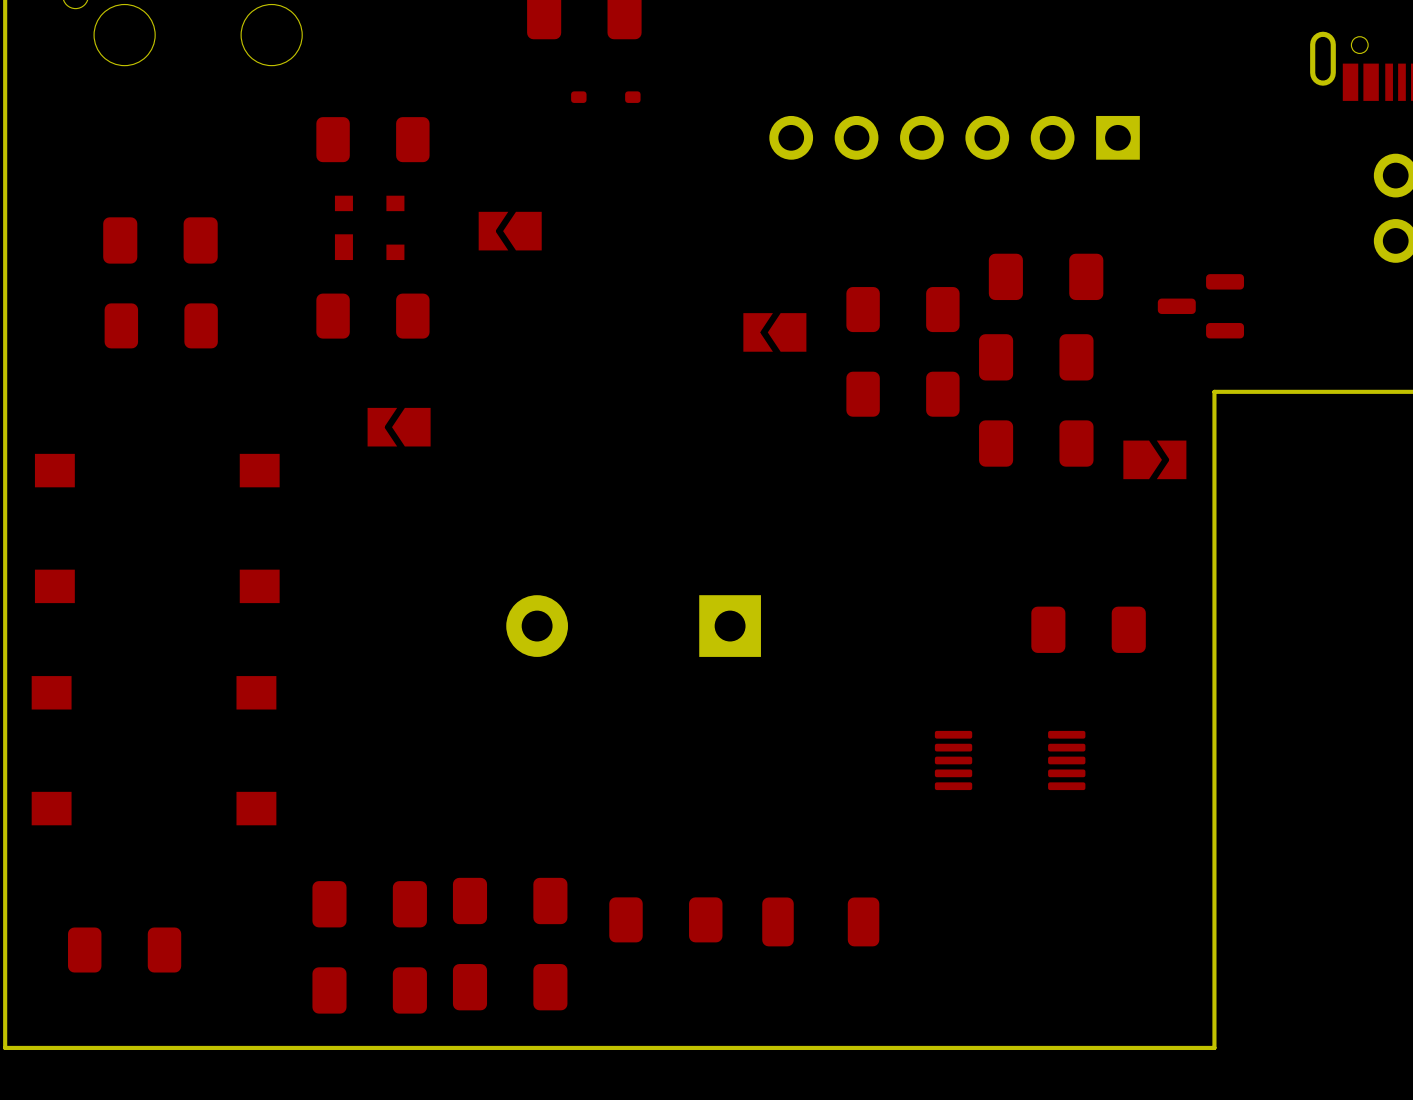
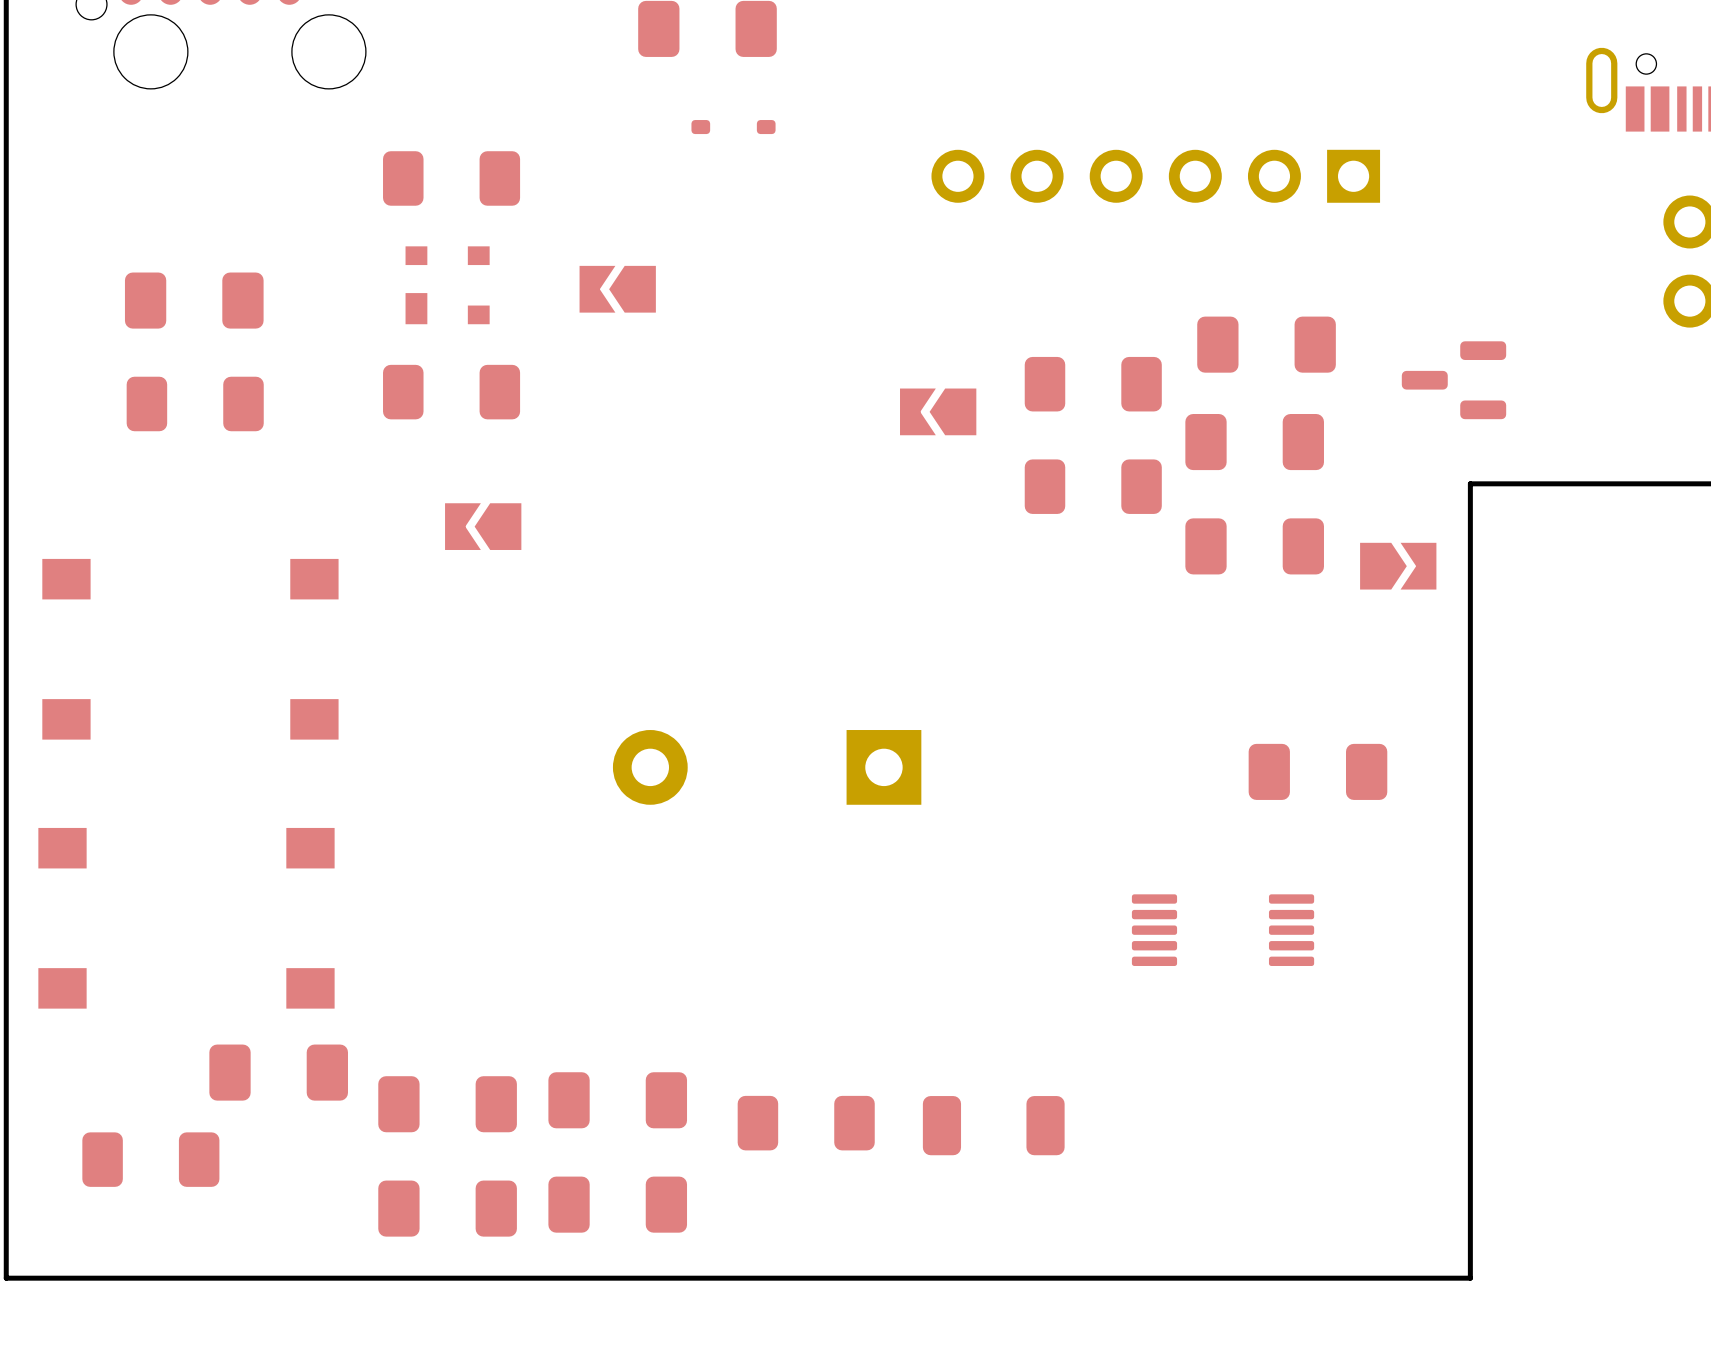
part: none -> (278, 1072)

